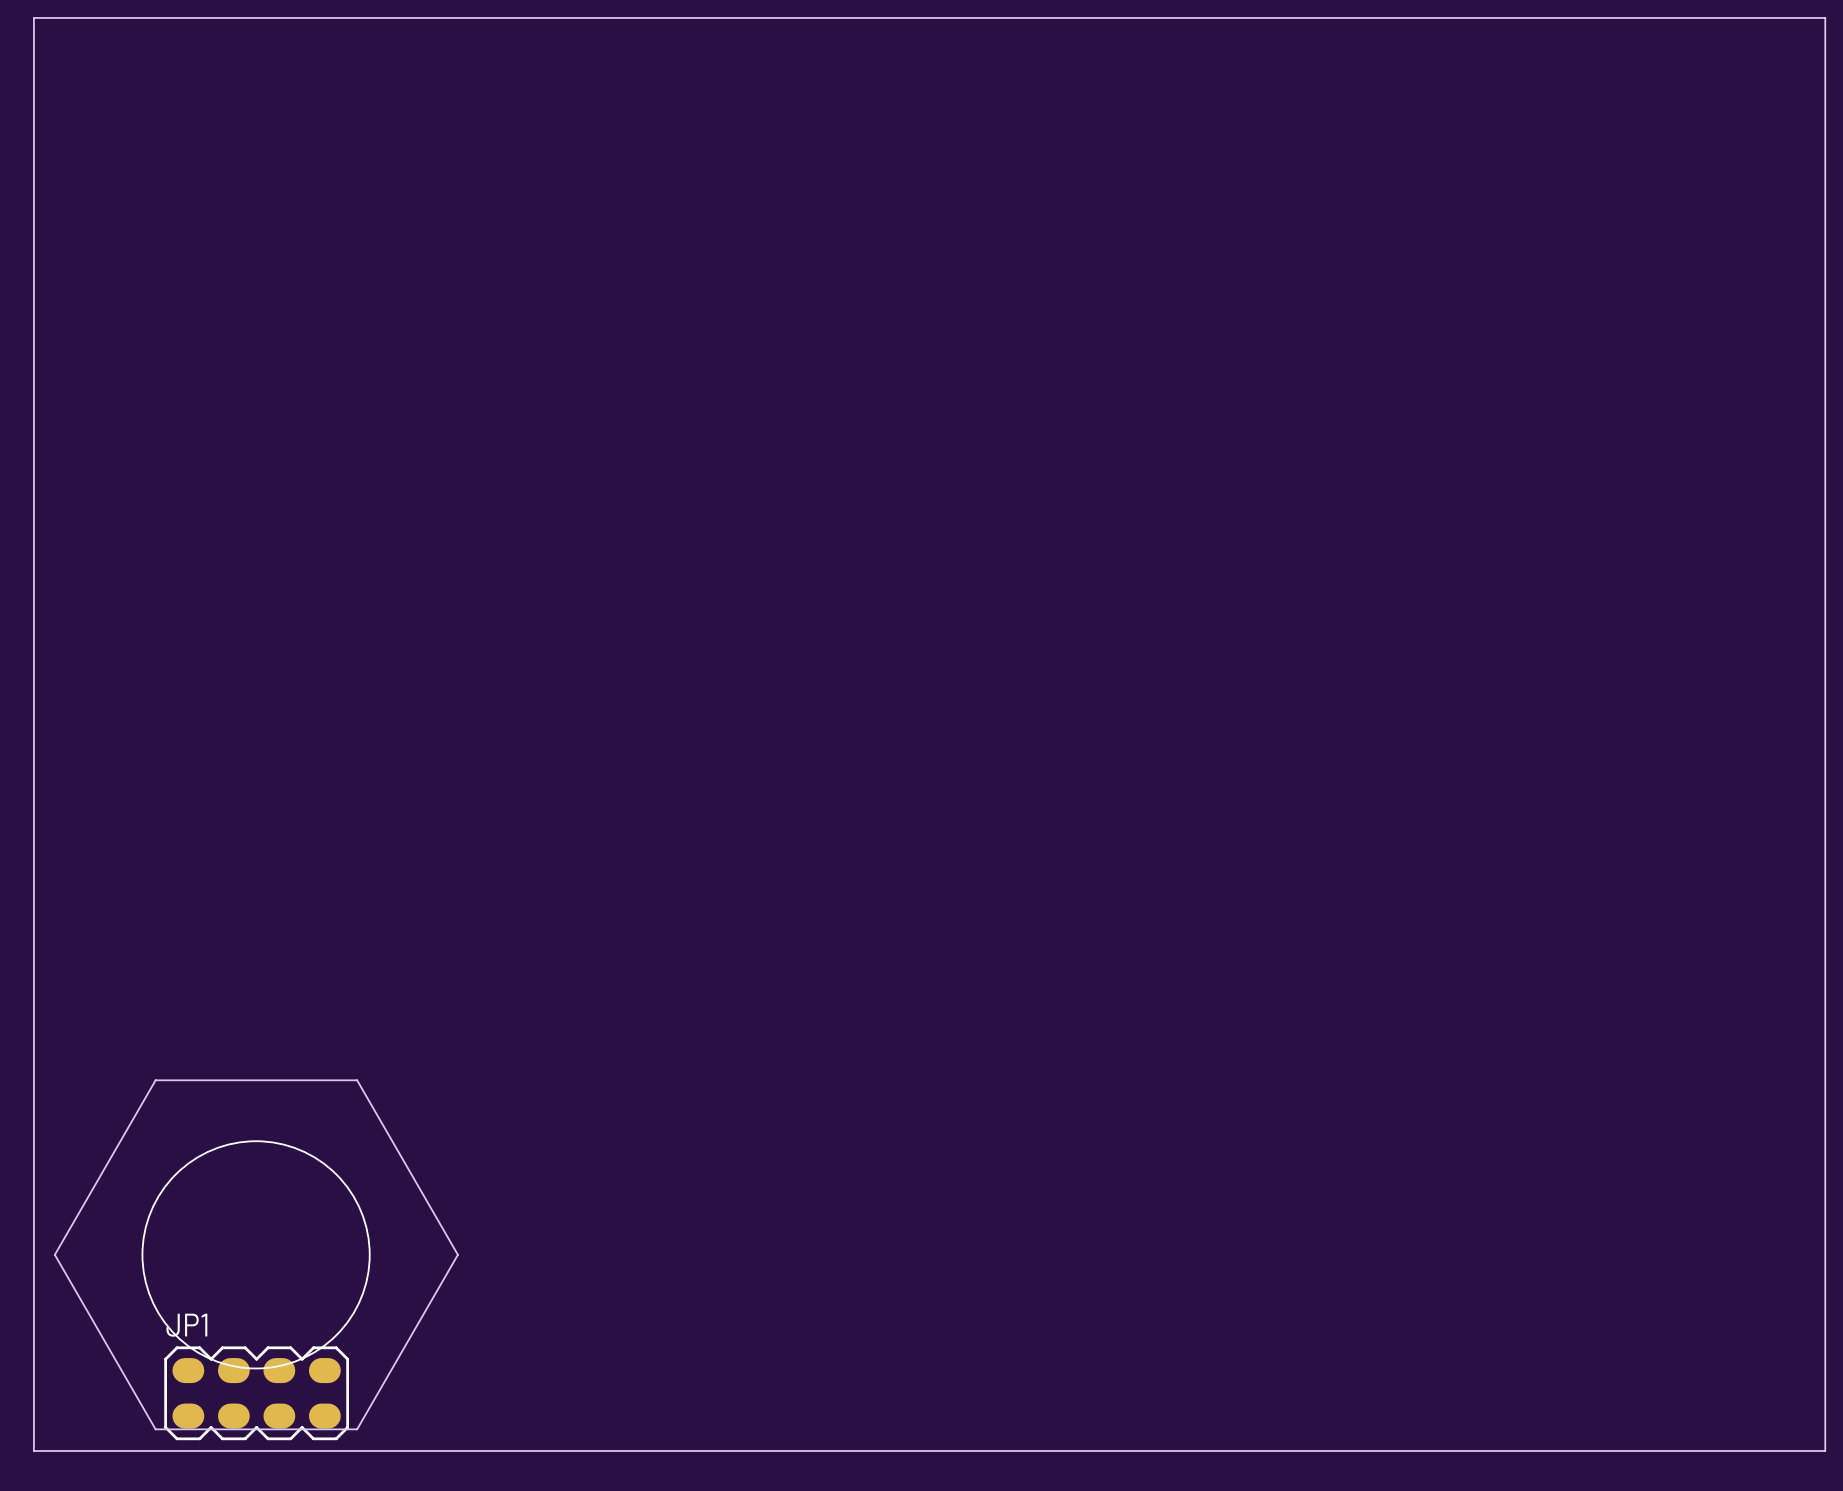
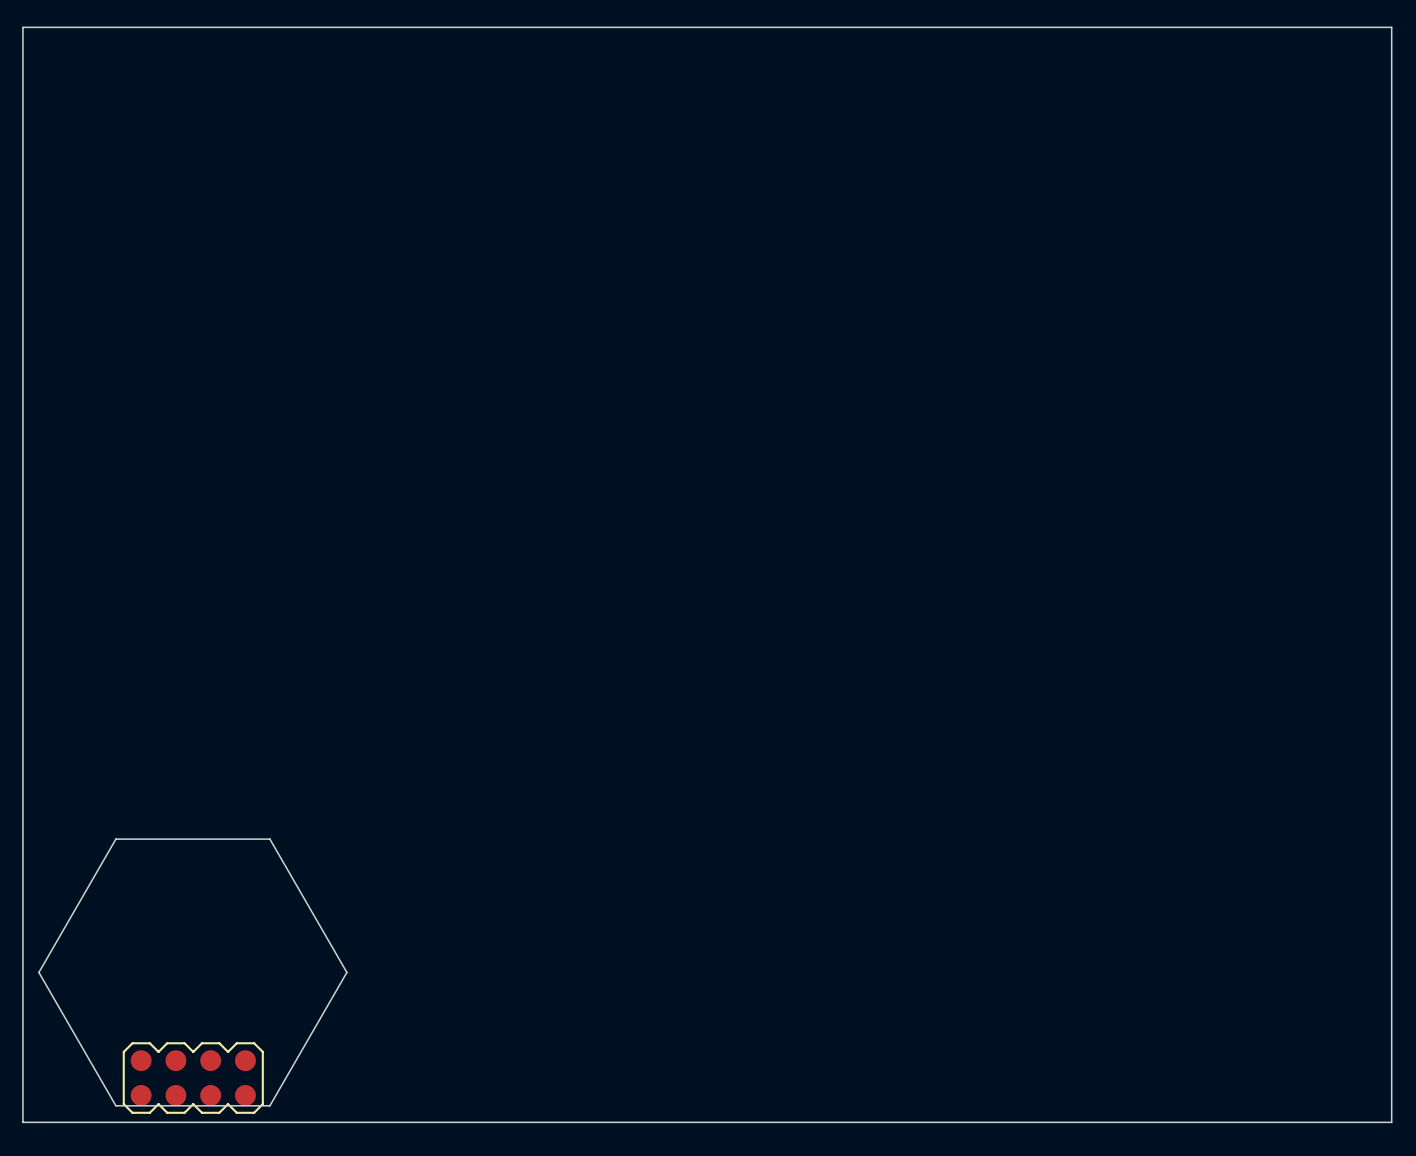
drawing: [141, 1140, 371, 1370] -> none
part: none -> (193, 1078)
JP1: (256, 1393) -> none

